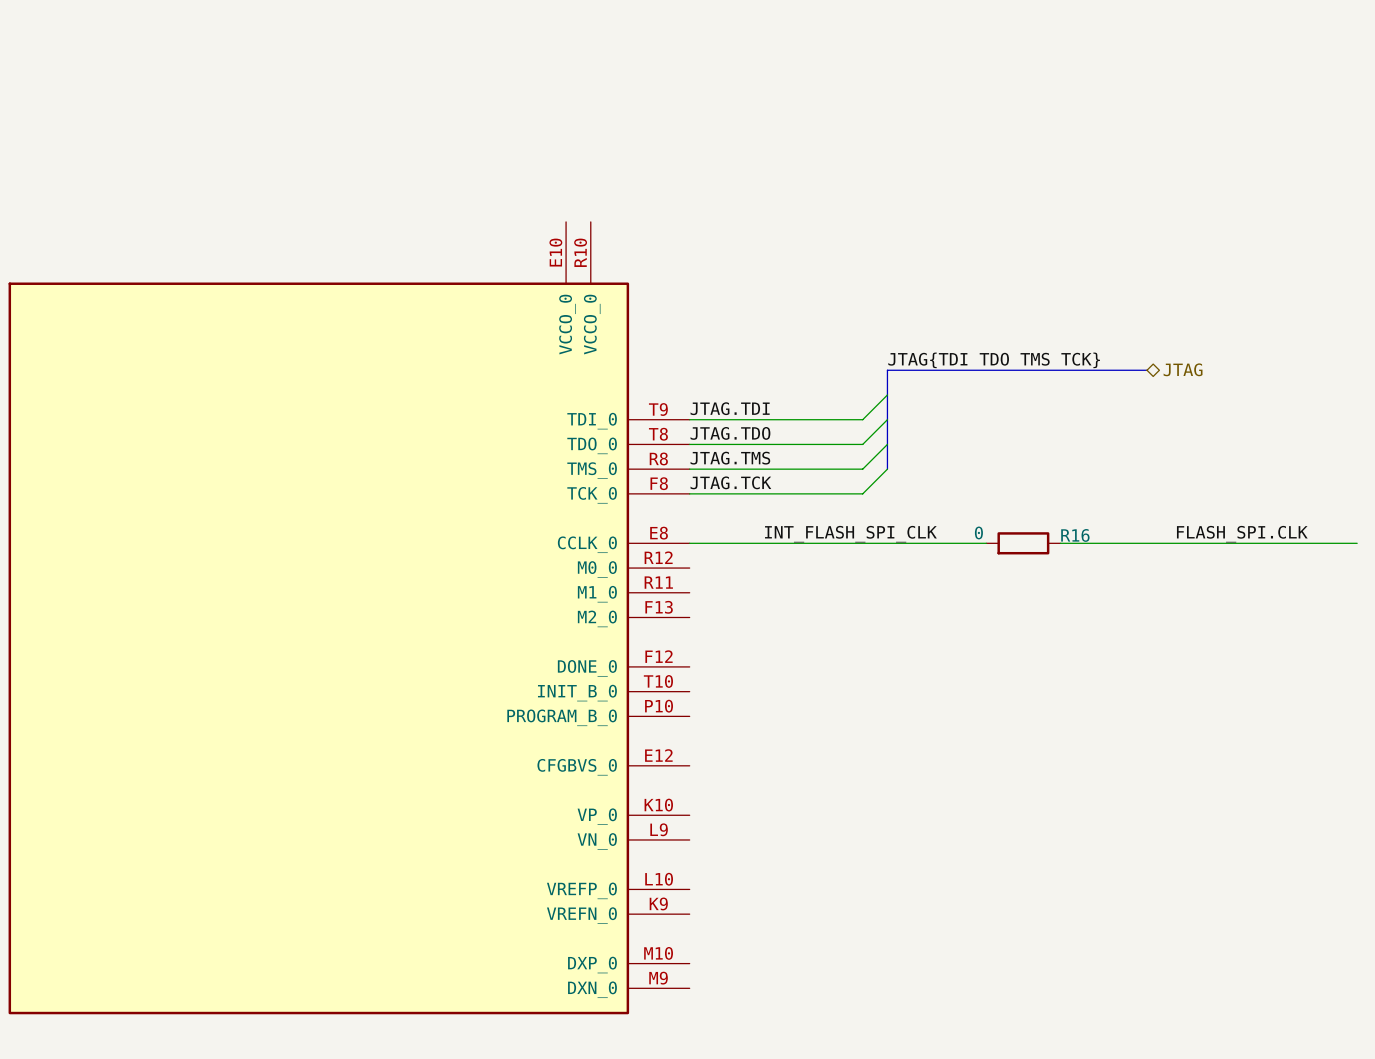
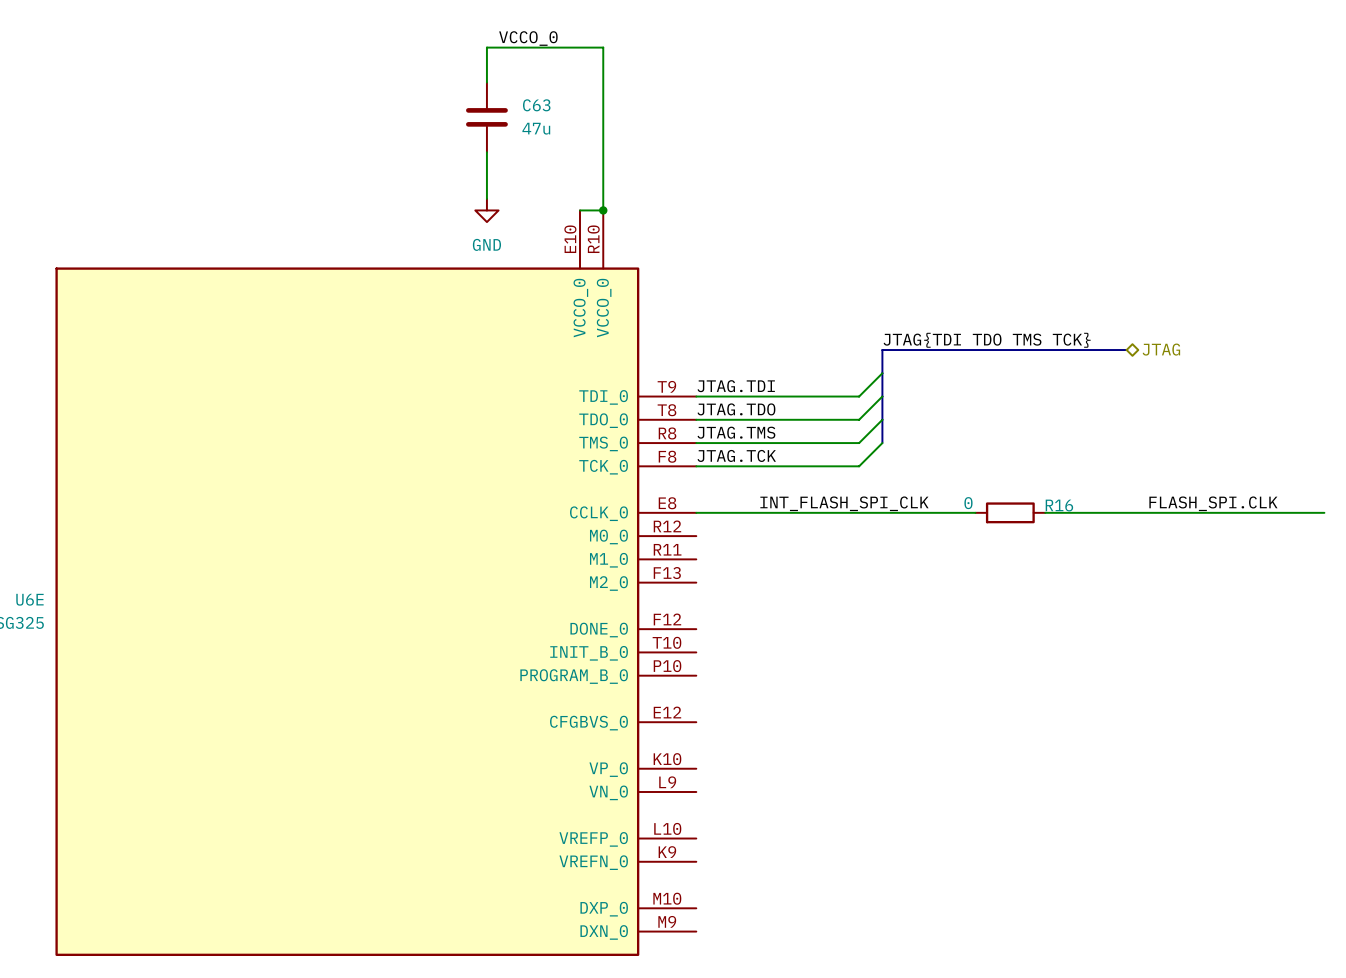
label: none -> VCCO_0 (528, 38)
wire: none -> (486, 82) (486, 47) (603, 47) (603, 210) (579, 210)
C63: none -> 47u (486, 117)
wire: none -> (486, 152) (486, 198)
power symbol: none -> GND (486, 210)
junction: none -> (603, 210)

